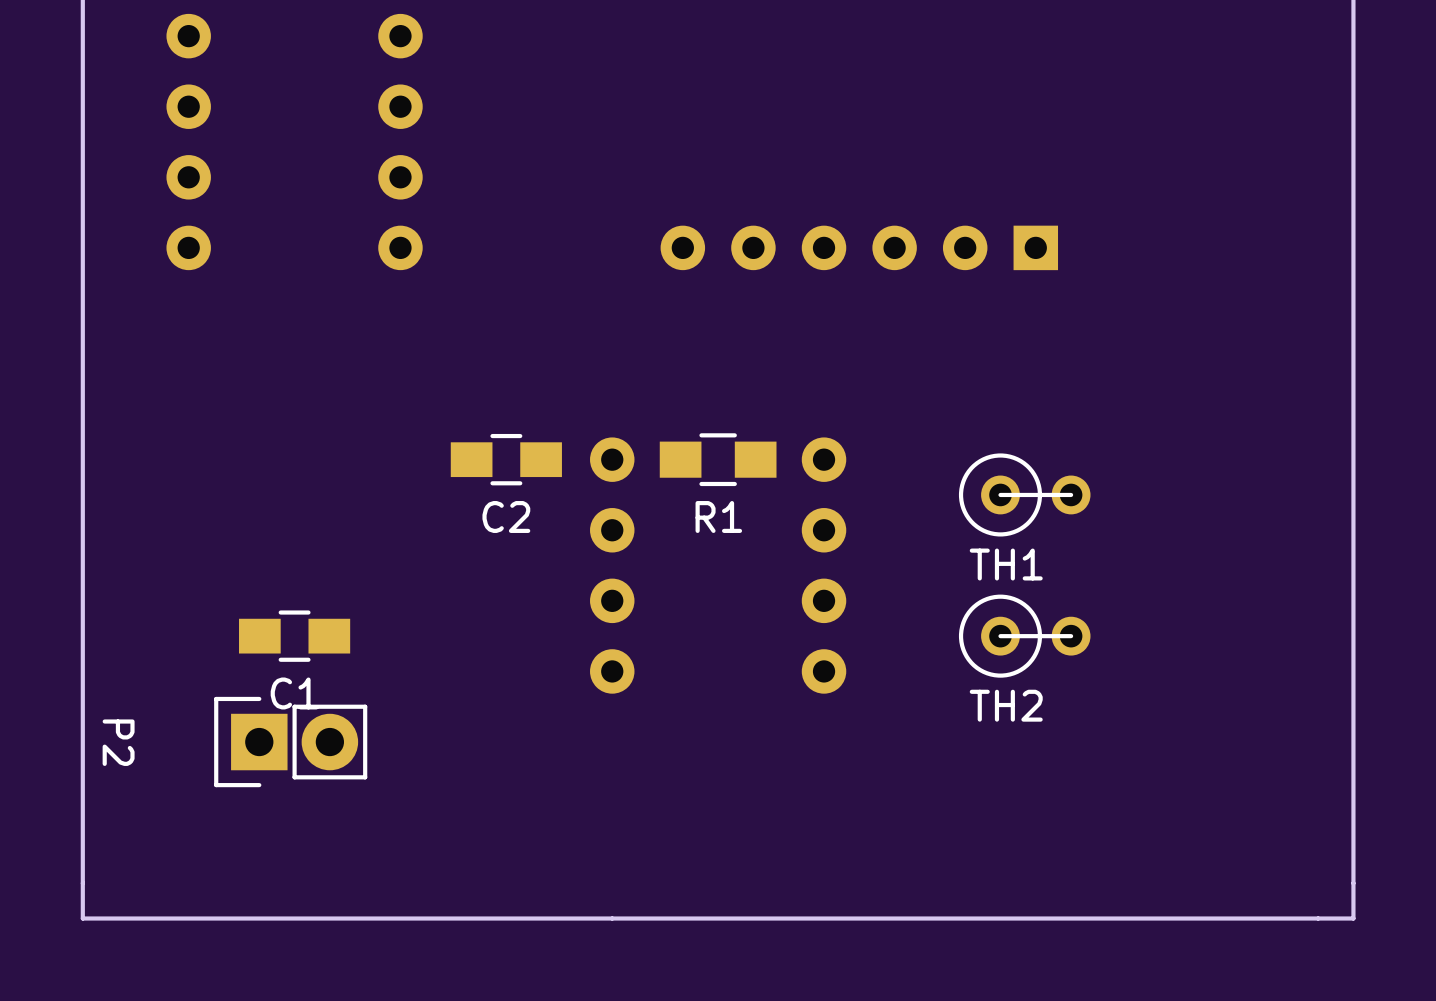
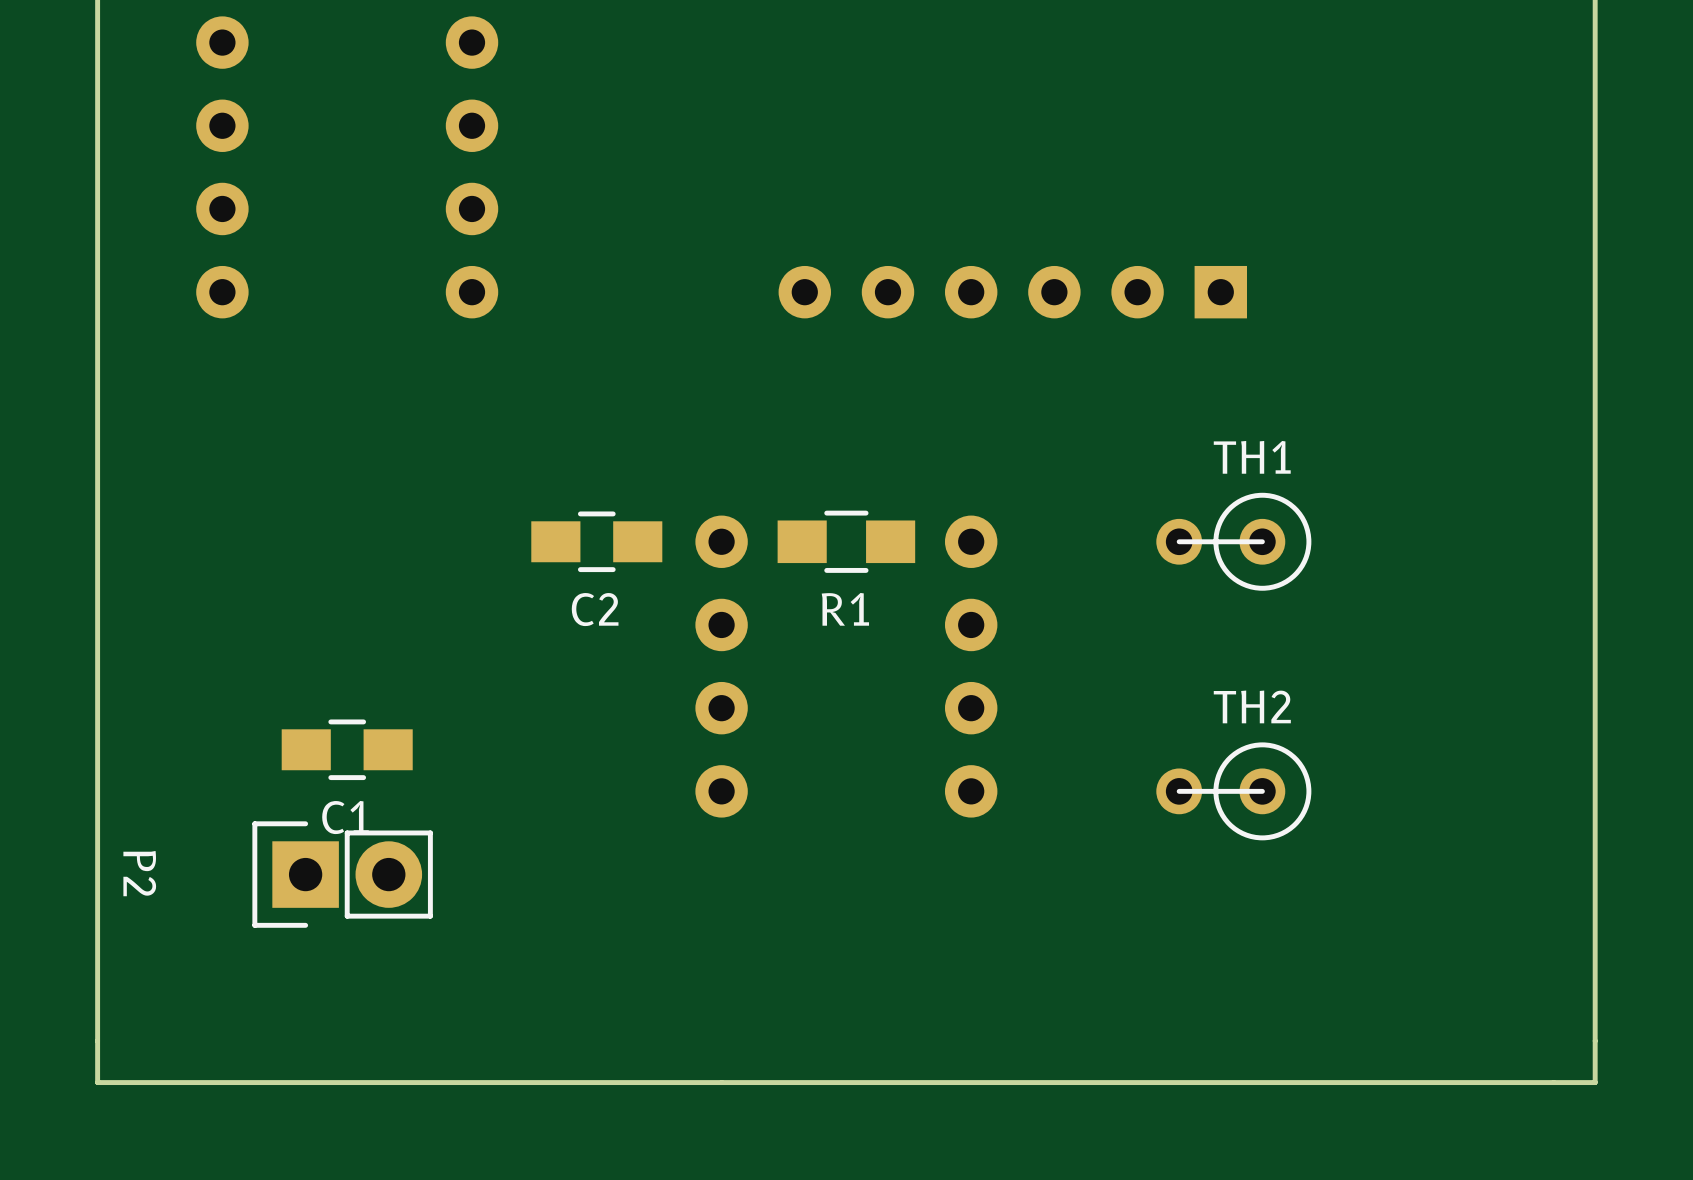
TH1 rotation: 0° (1024, 494) -> 180° (1233, 541)
TH2 rotation: 0° (1024, 636) -> 180° (1233, 791)

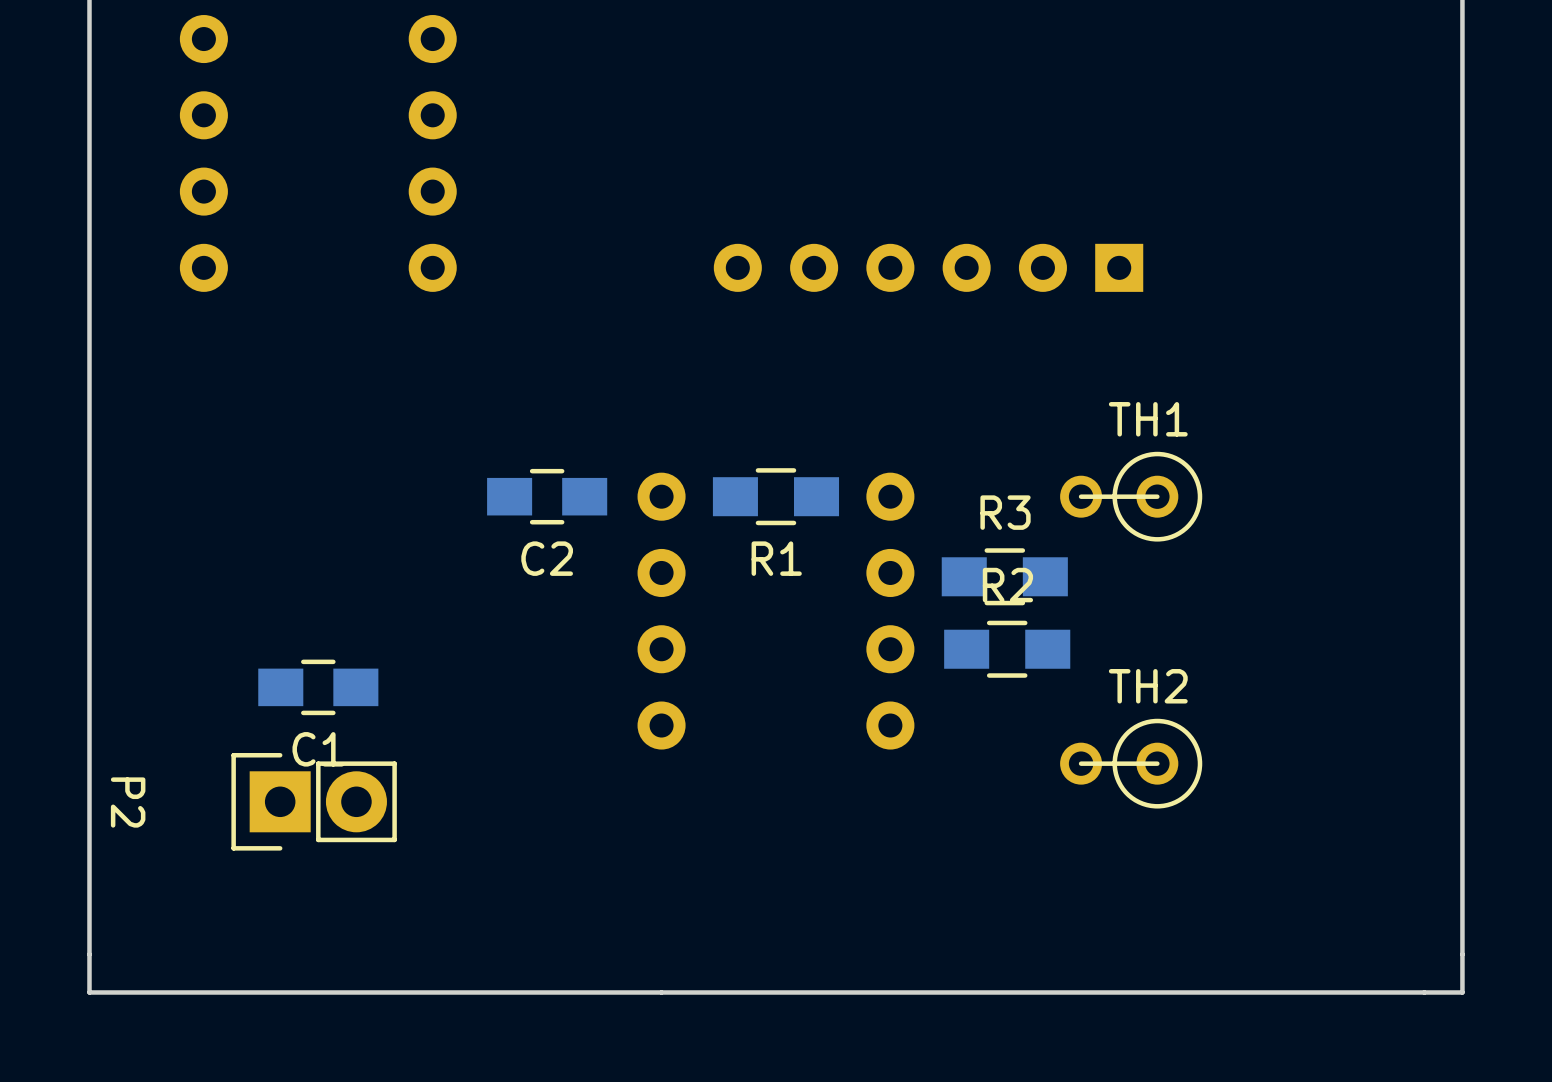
R3: none -> (1004, 576)
R2: none -> (1007, 649)
TH2 position: (1233, 791) -> (1131, 763)

